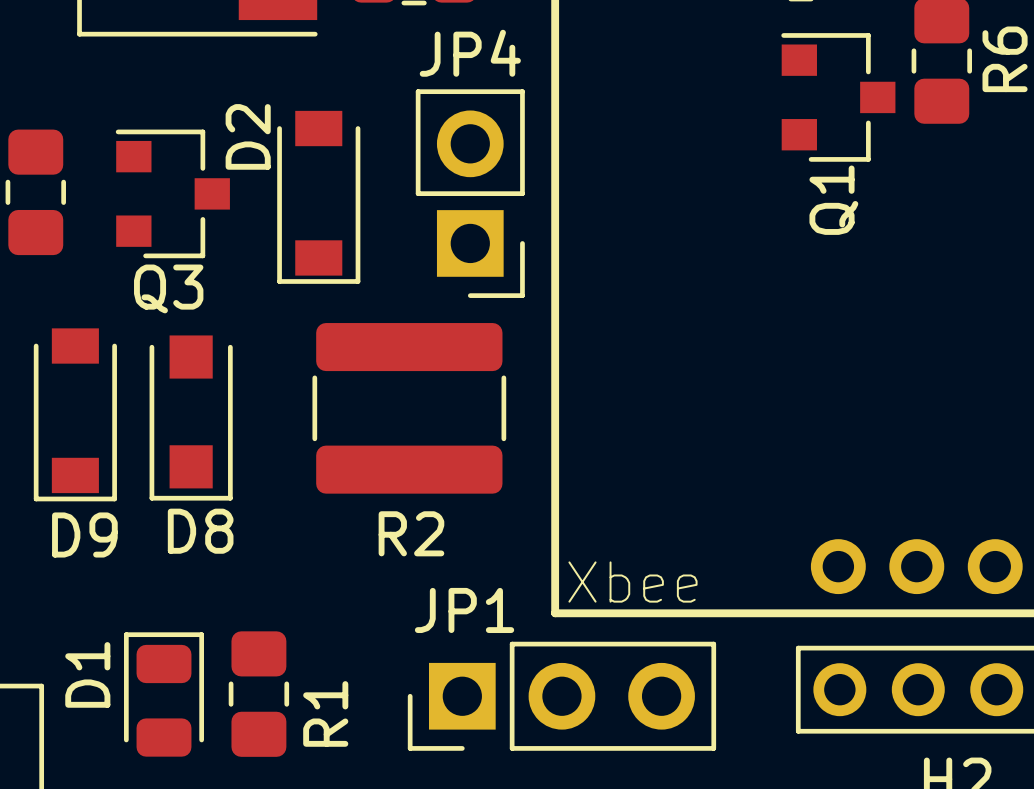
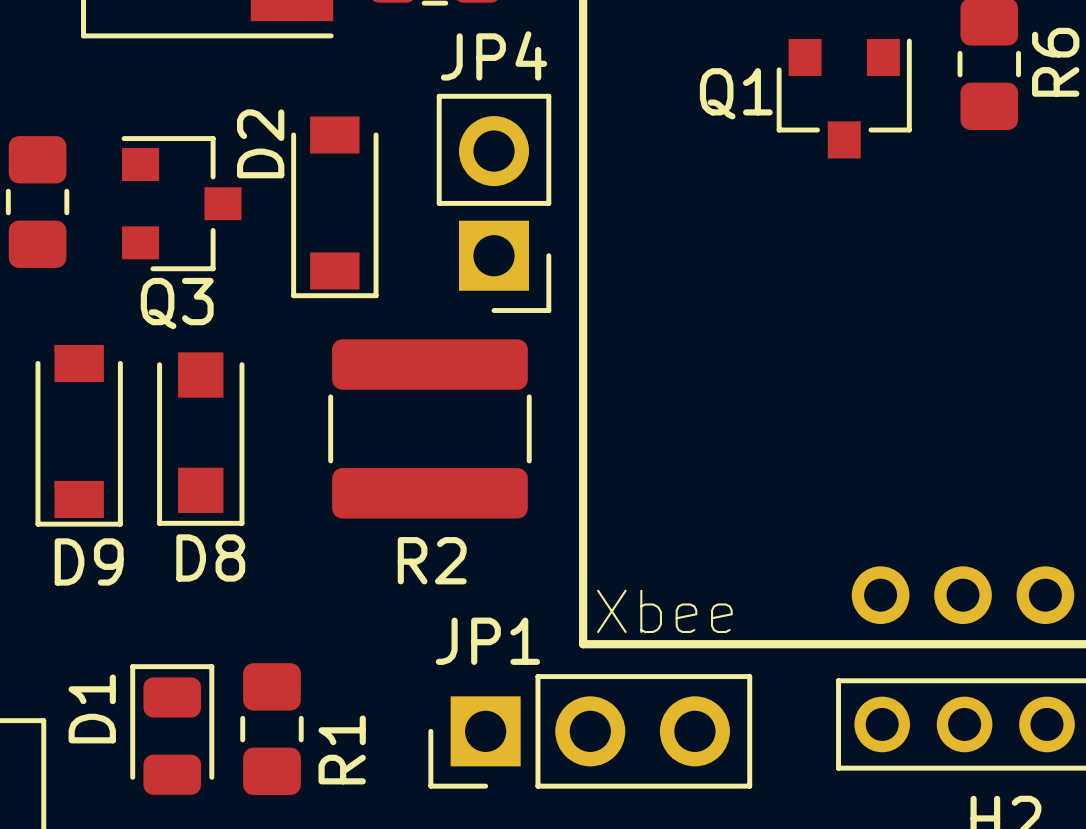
Q1 rotation: 0° (838, 97) -> 90° clockwise (844, 98)

